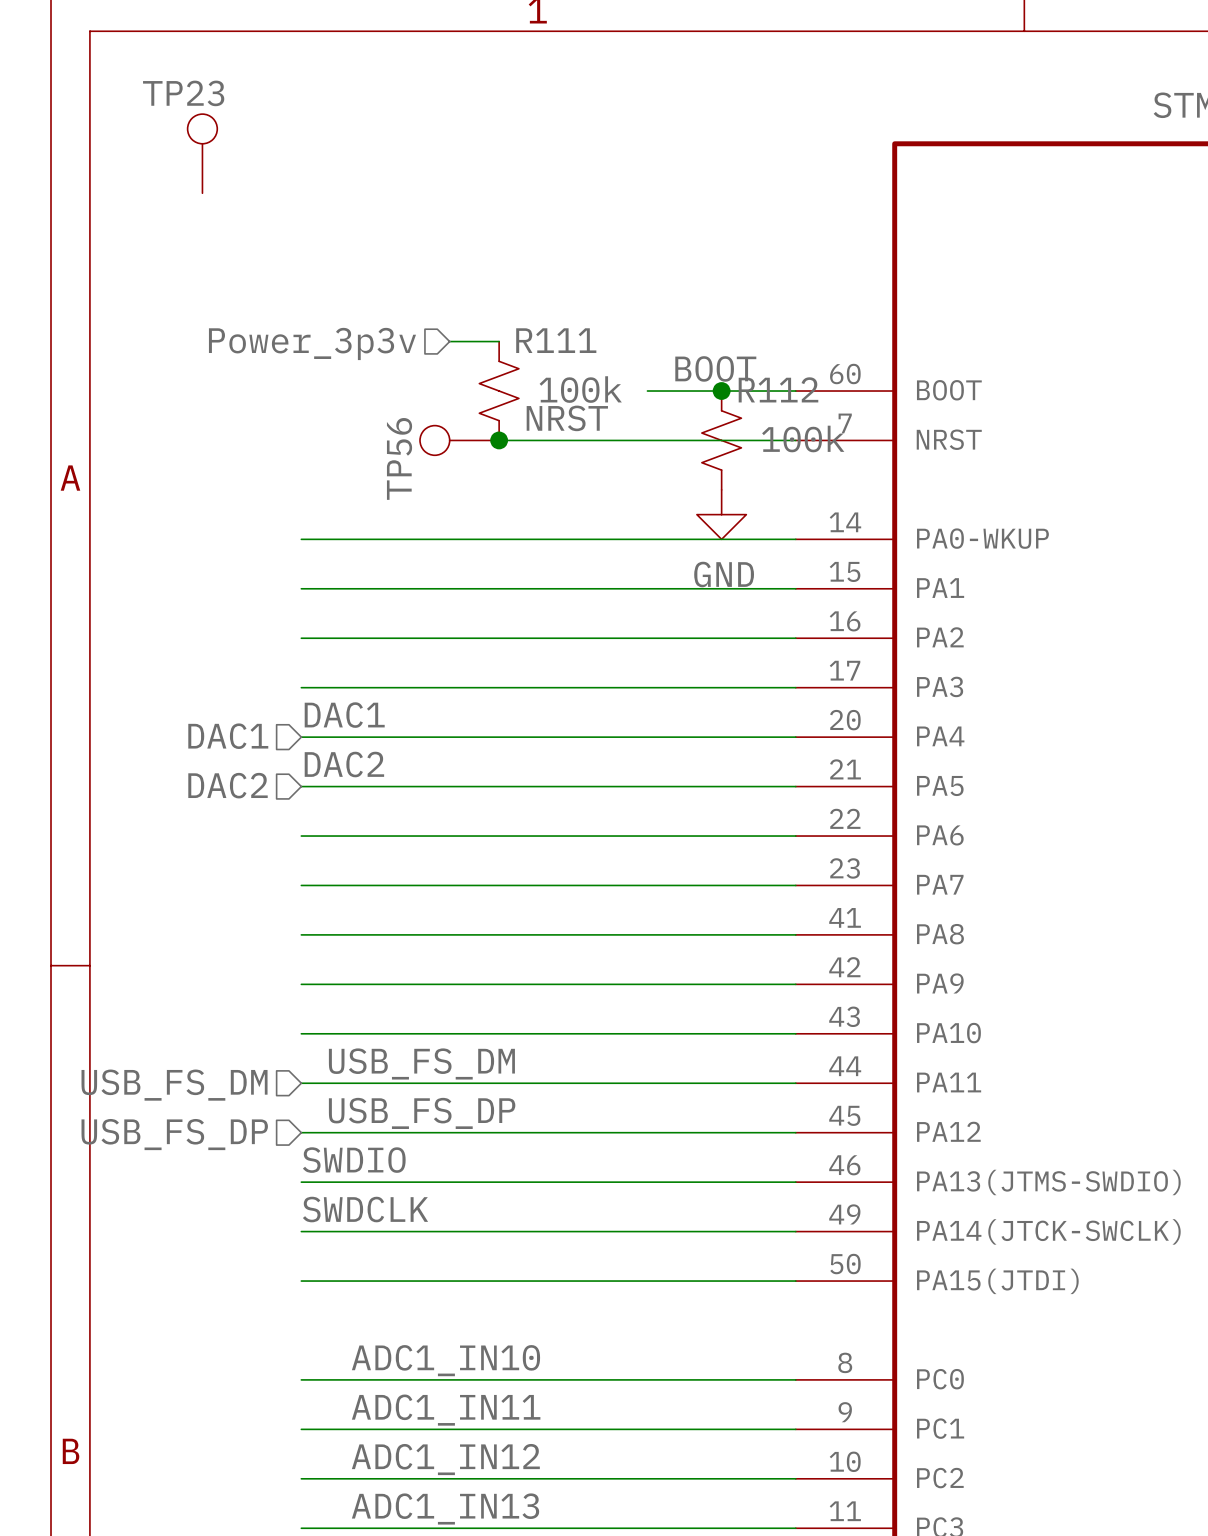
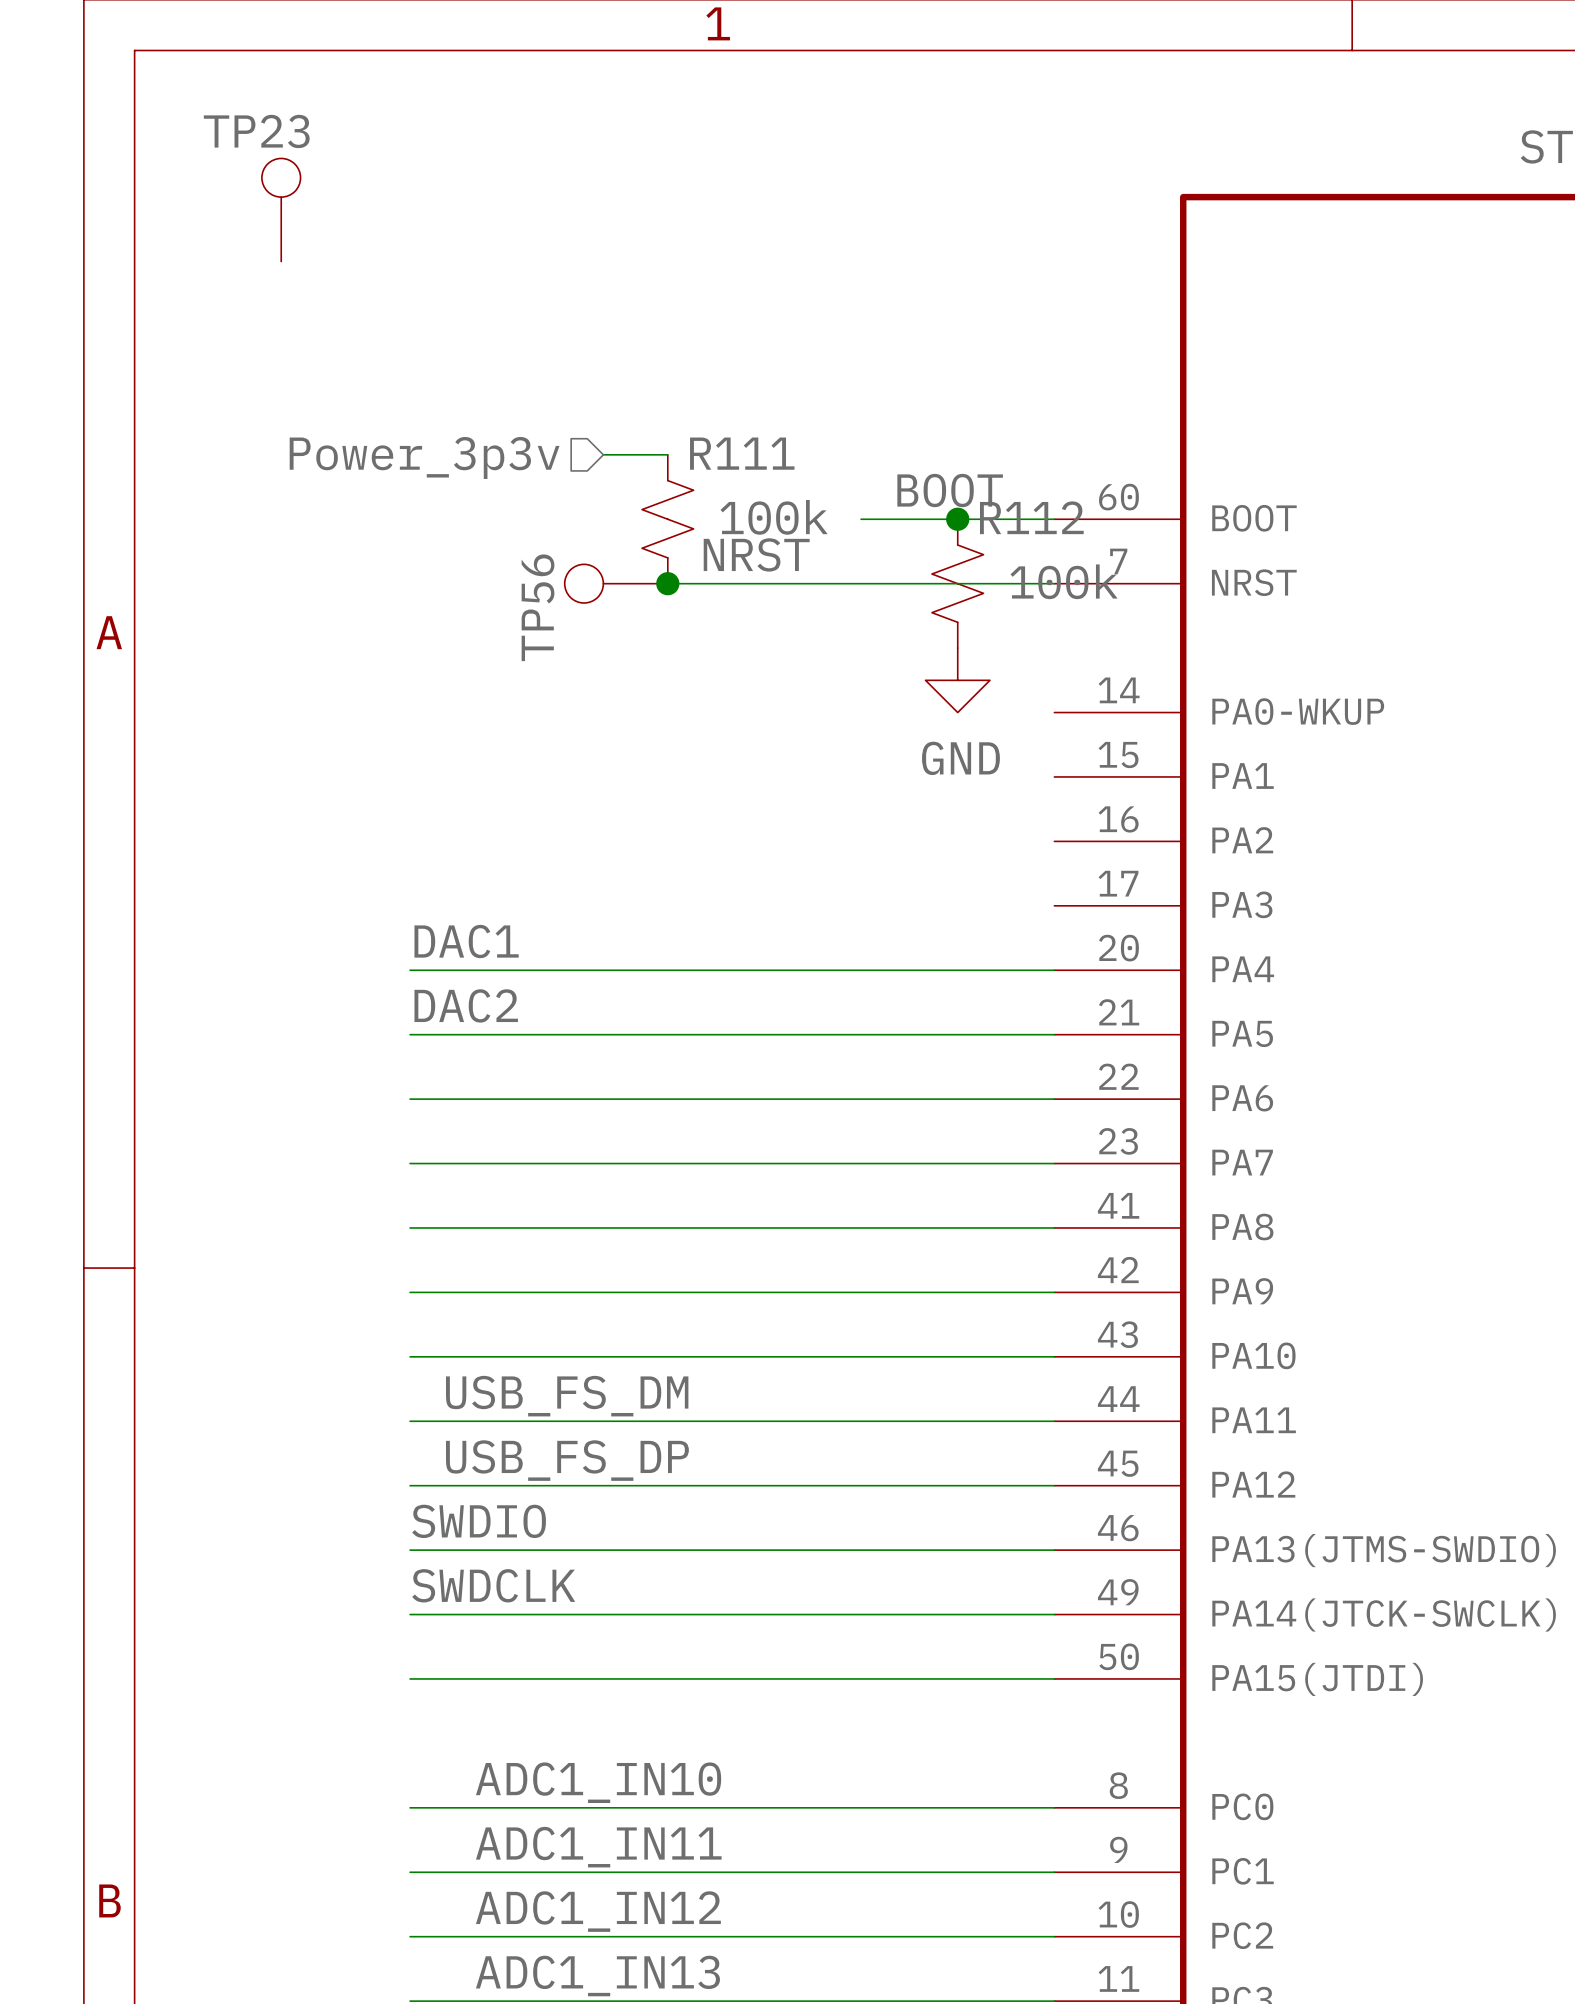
wire: (301, 539) (795, 539) -> none
wire: (301, 588) (795, 588) -> none
wire: (301, 638) (795, 638) -> none
wire: (301, 687) (795, 687) -> none
hierarchical label: DAC1 (228, 736) -> none
hierarchical label: DAC2 (228, 785) -> none
hierarchical label: USB_FS_DM (174, 1085) -> none
hierarchical label: USB_FS_DP (174, 1134) -> none

